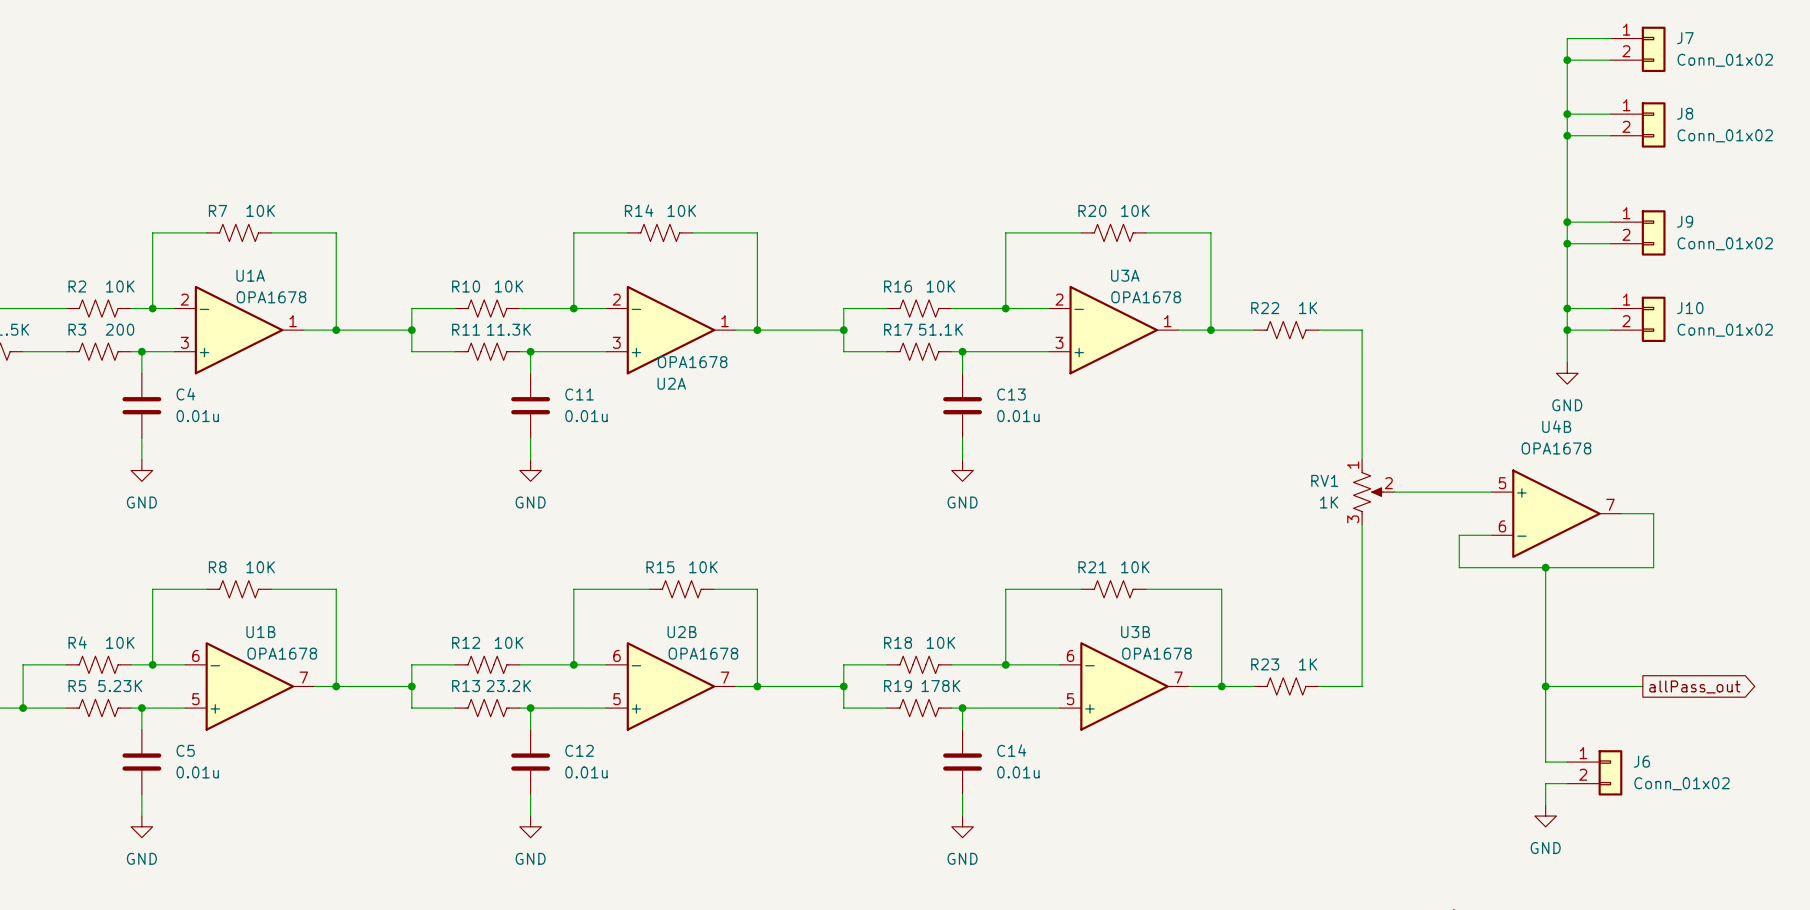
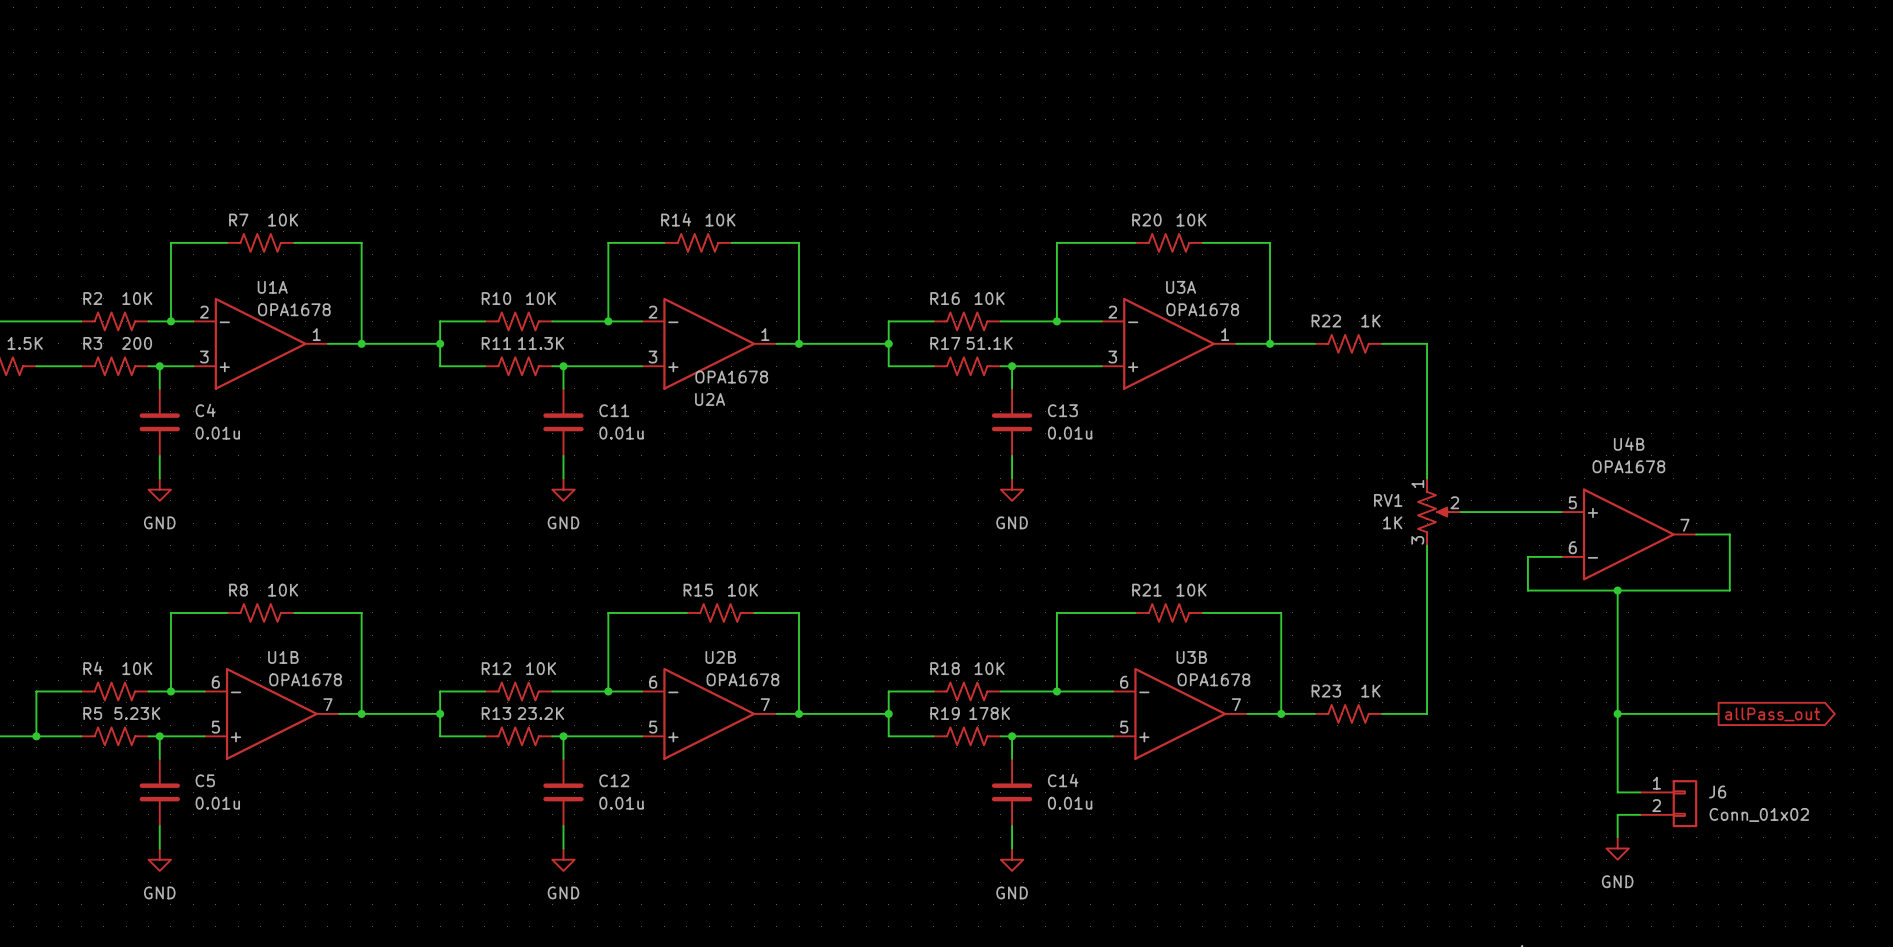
wire: (1610, 38) (1567, 38) (1567, 362) -> none
J7: Conn_01x02 (1638, 49) -> none
wire: (1567, 60) (1610, 60) -> none
junction: (1567, 60) -> none
wire: (1567, 114) (1610, 114) -> none
junction: (1567, 114) -> none
J8: Conn_01x02 (1638, 124) -> none
wire: (1567, 135) (1610, 135) -> none
junction: (1567, 135) -> none
wire: (1567, 222) (1610, 222) -> none
junction: (1567, 222) -> none
J9: Conn_01x02 (1638, 232) -> none
wire: (1567, 243) (1610, 243) -> none
junction: (1567, 243) -> none
wire: (1567, 308) (1610, 308) -> none
junction: (1567, 308) -> none
J10: Conn_01x02 (1638, 319) -> none
wire: (1567, 330) (1610, 330) -> none
junction: (1567, 330) -> none
power symbol: GND (1567, 373) -> none

